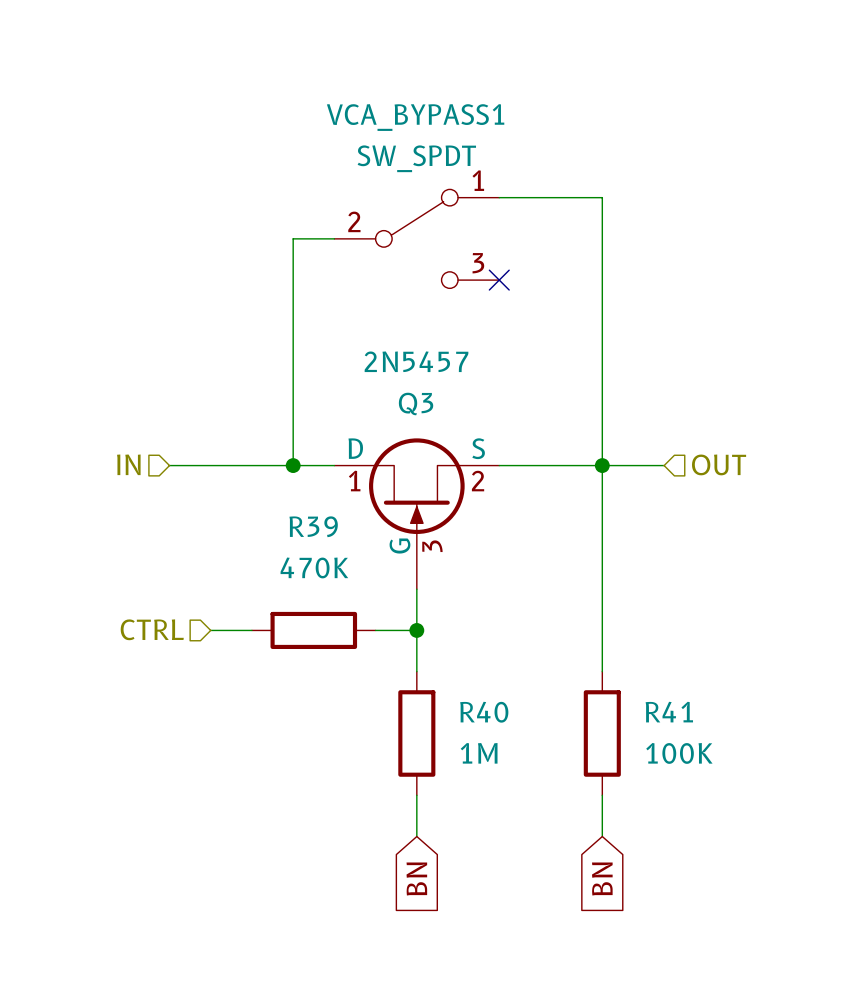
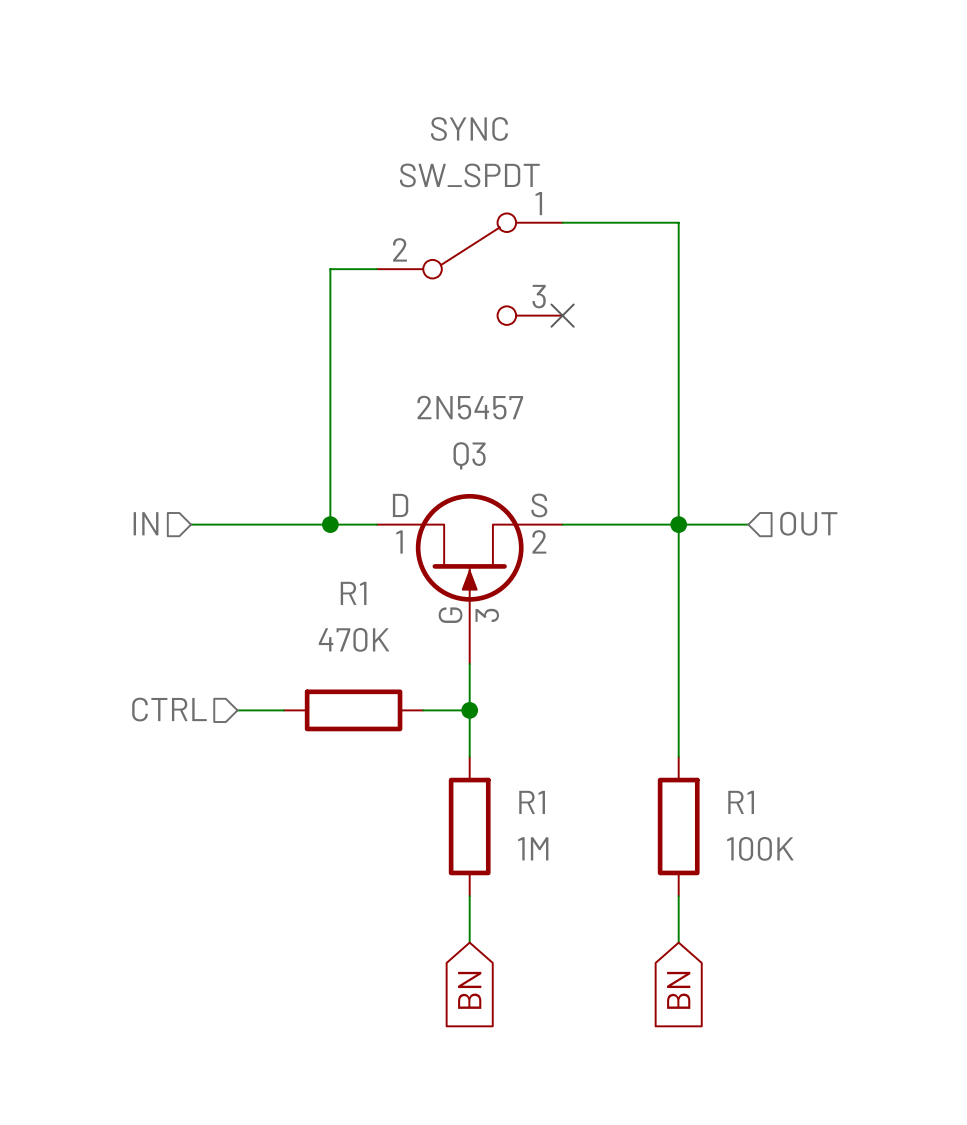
VCA_BYPASS1 name: VCA_BYPASS1 (415, 117) -> SYNC (469, 128)
R39 name: R39 (313, 526) -> R1 (353, 593)
R40 name: R40 (484, 712) -> R1 (532, 802)
R41 name: R41 (669, 712) -> R1 (741, 802)

